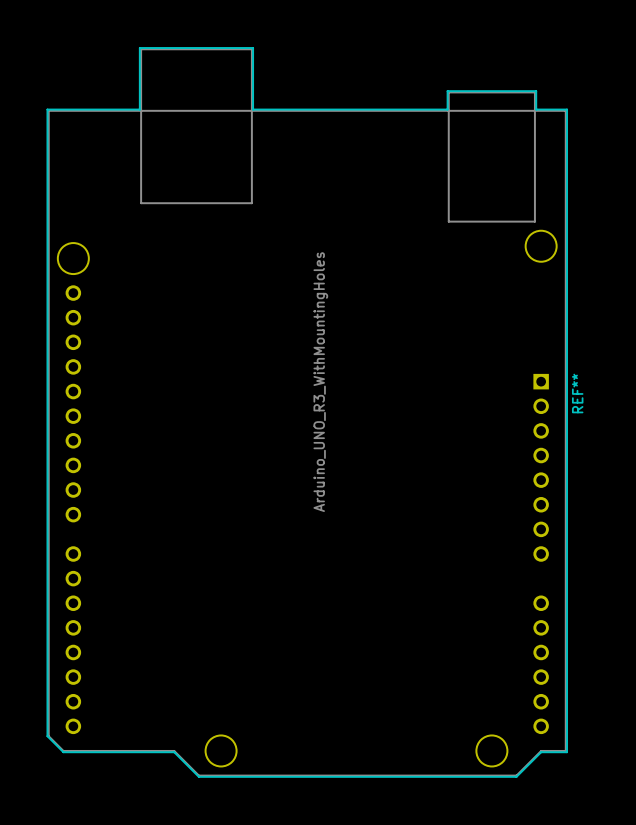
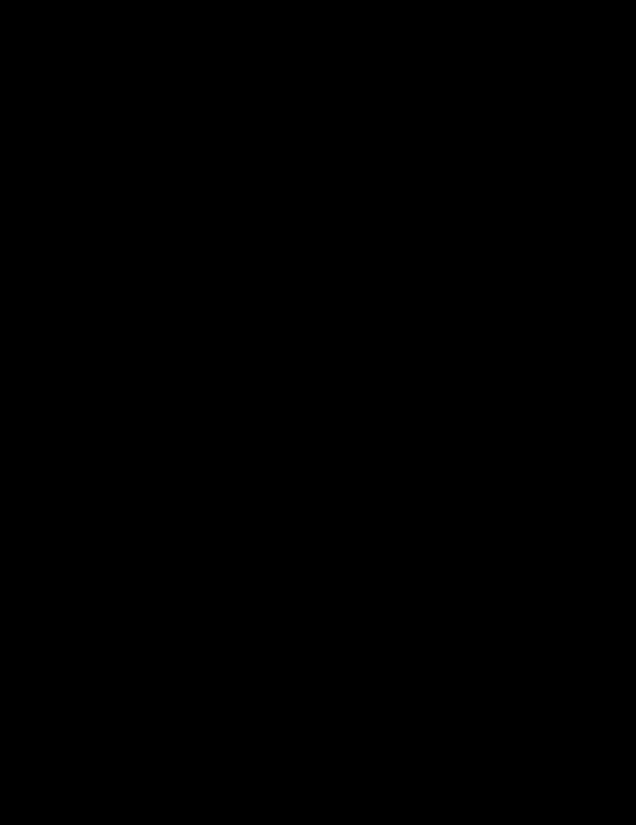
REF**: Arduino_UNO_R3_WithMountingHoles (307, 412) -> none

